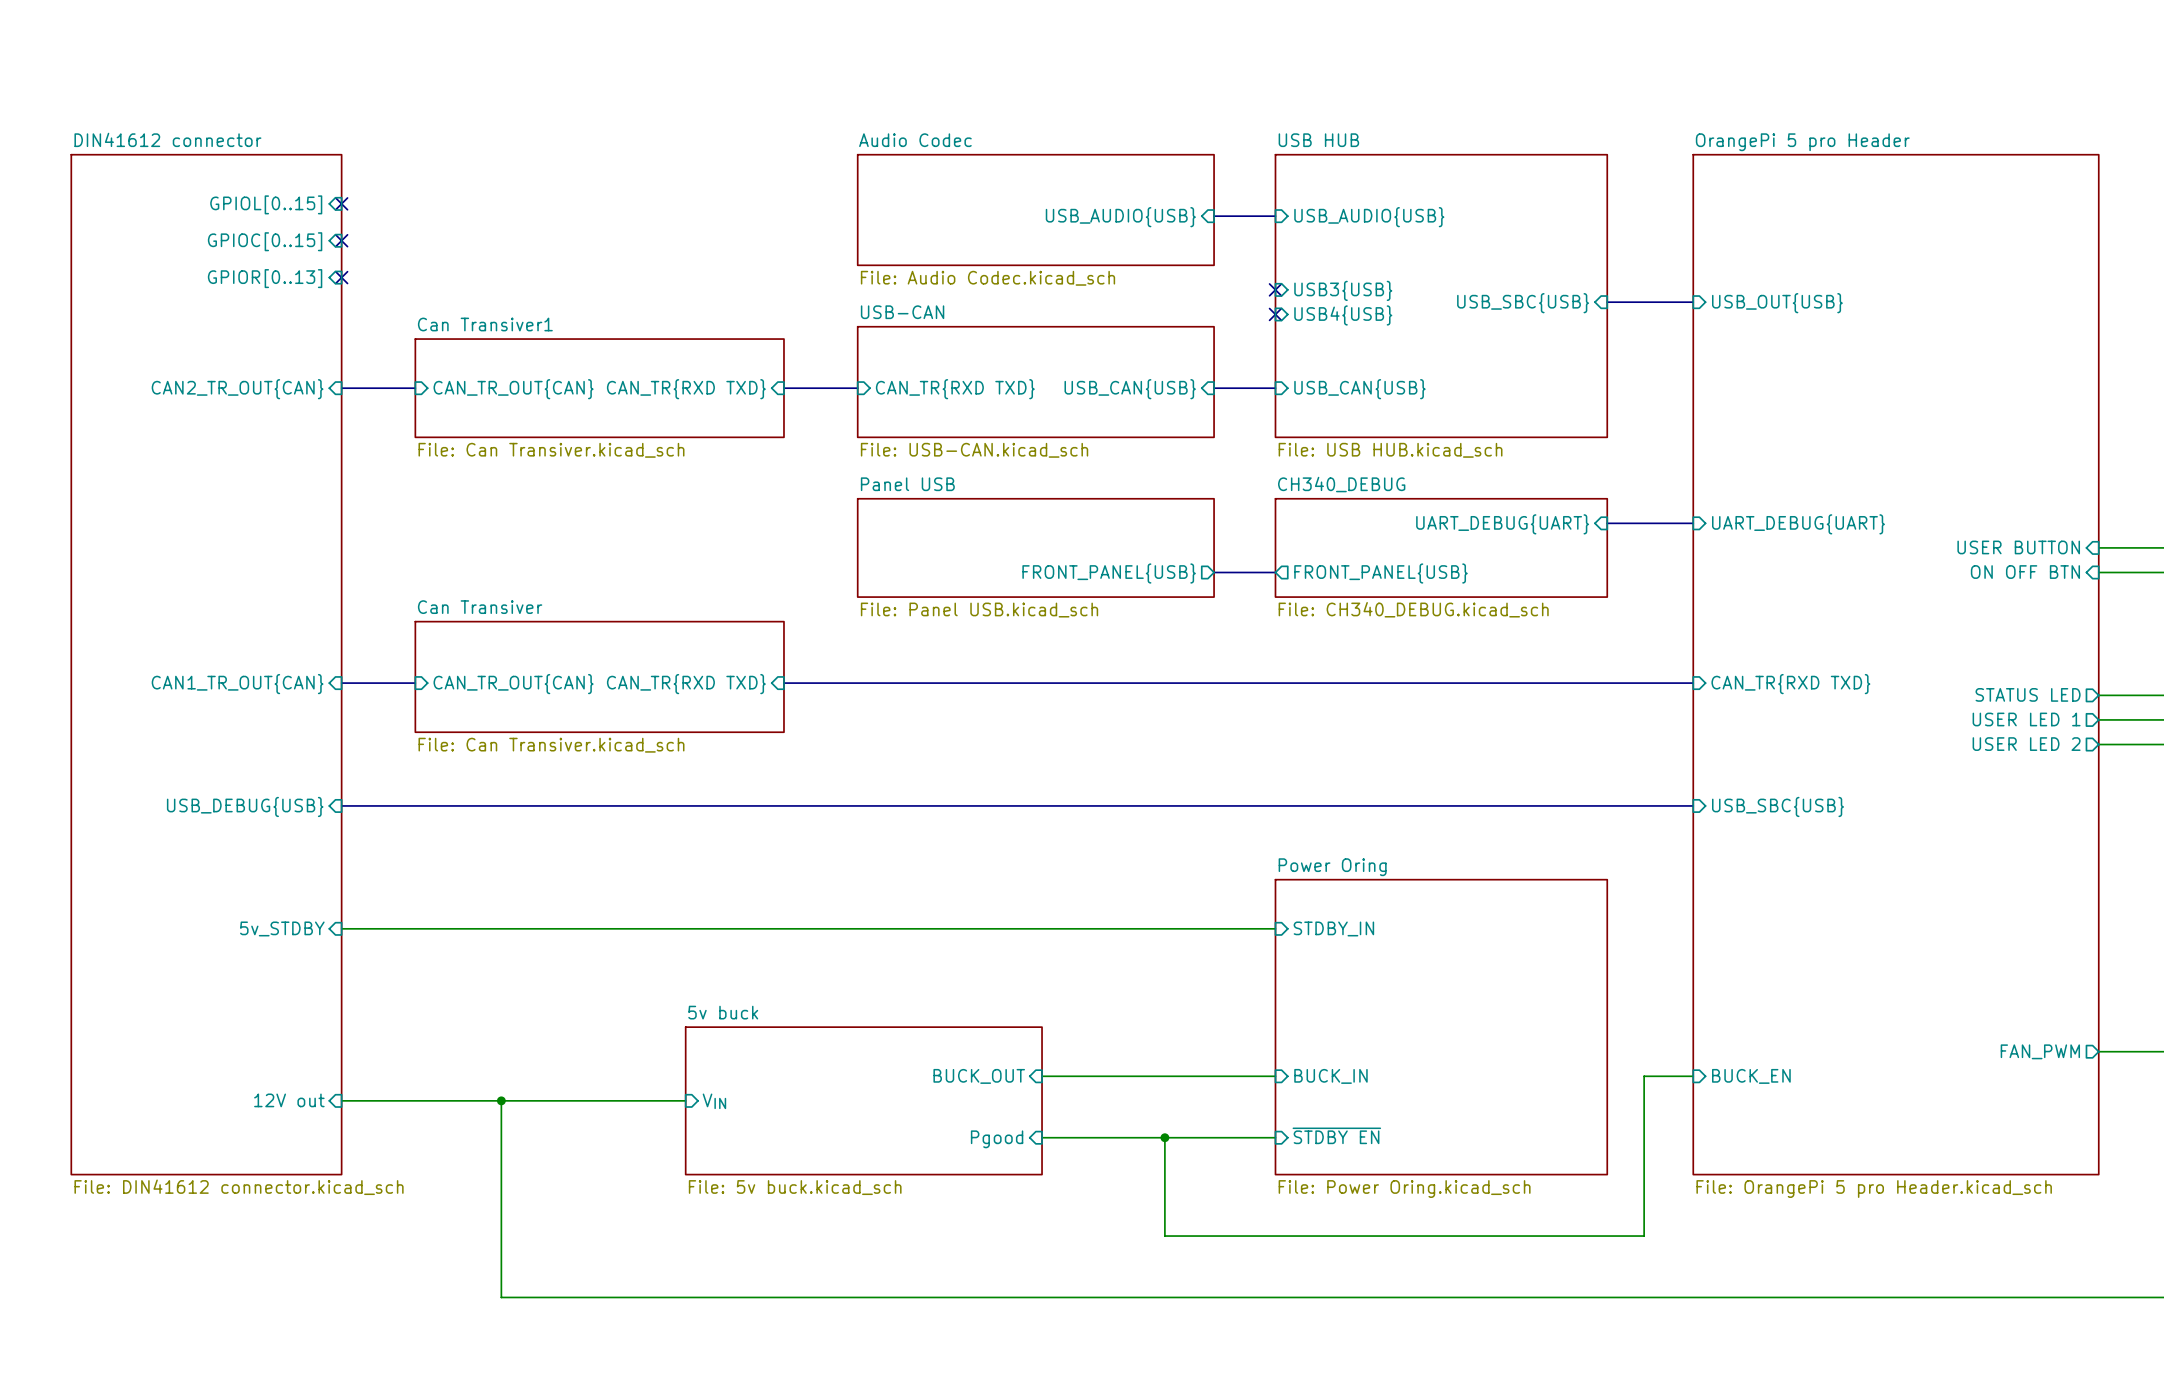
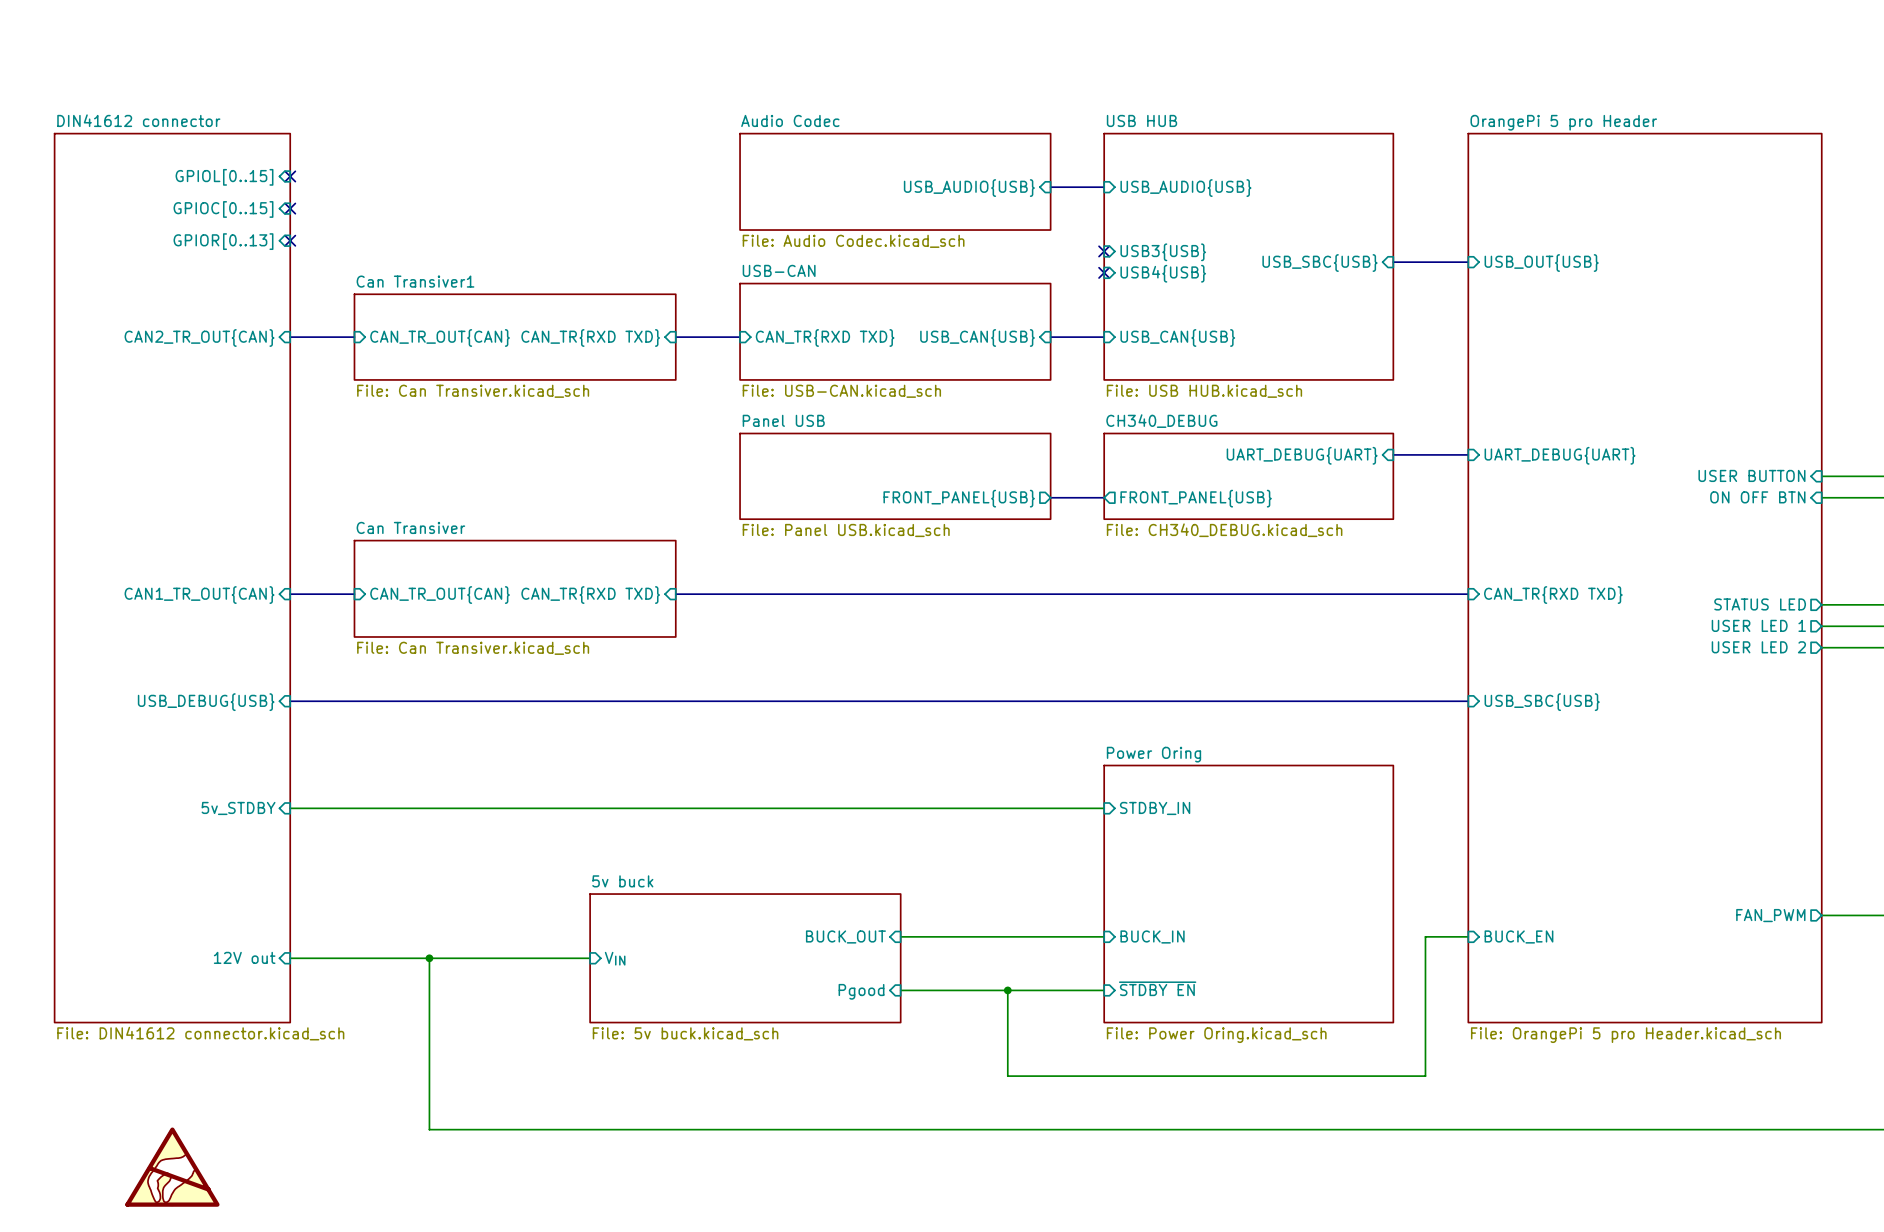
power symbol: none -> (172, 1167)

